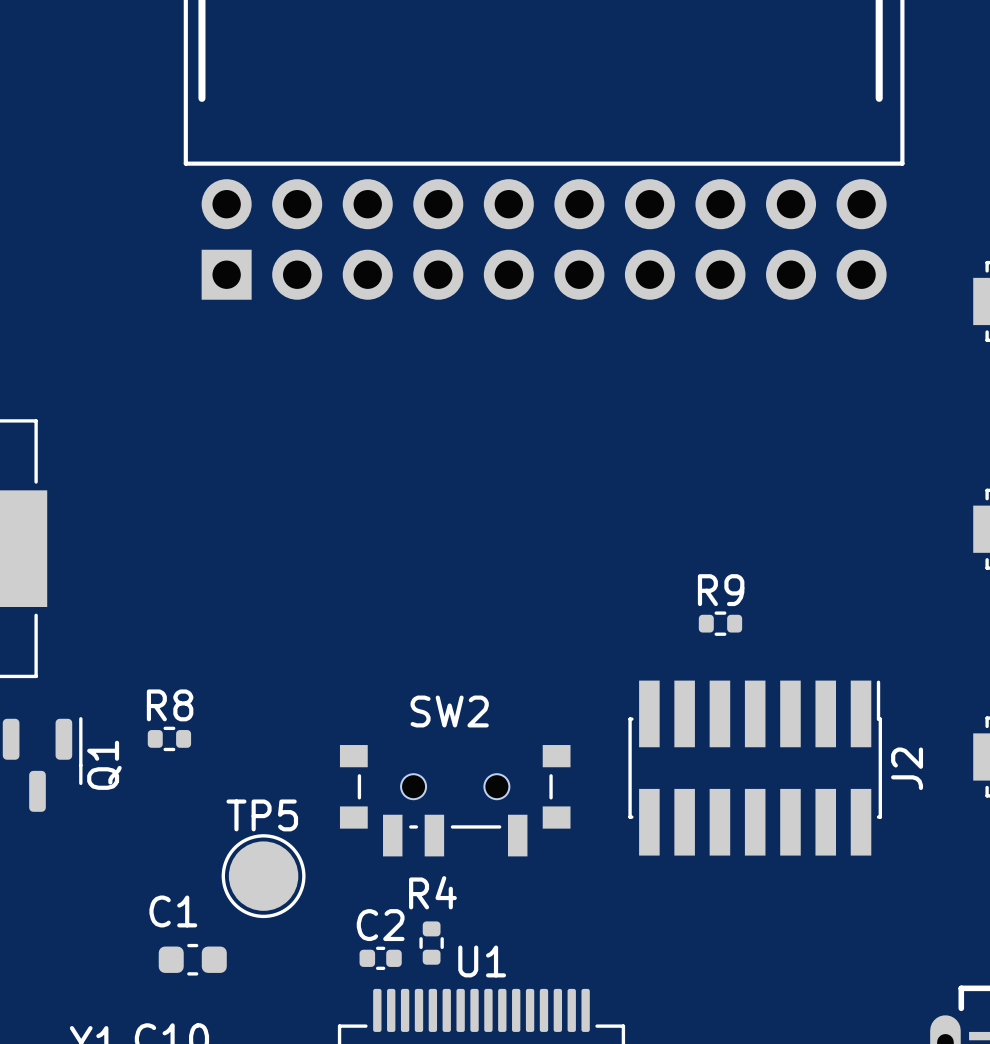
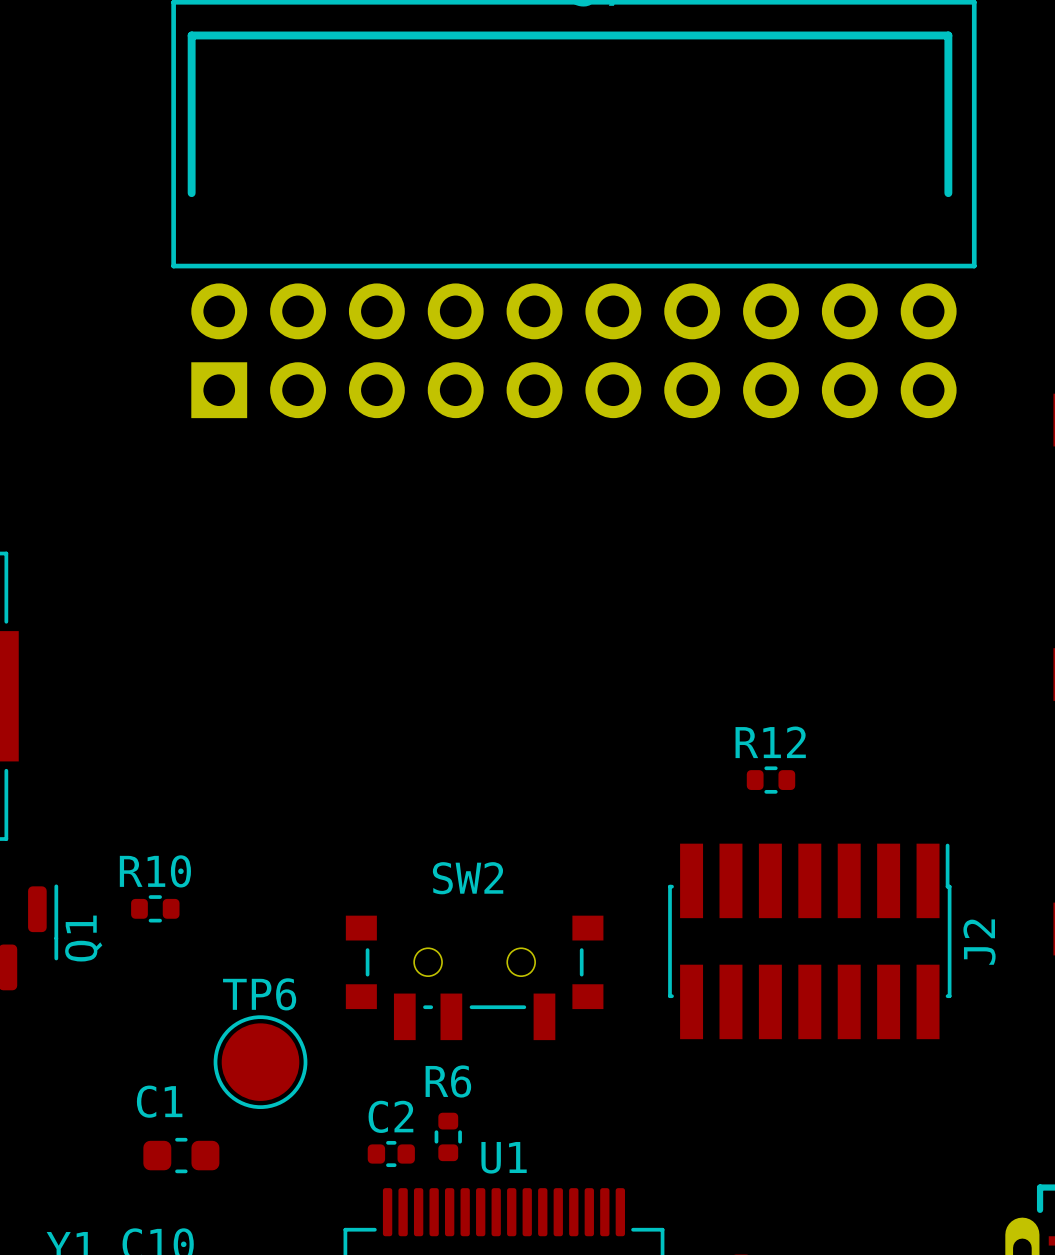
R9 name: R9 (721, 590) -> R12 (770, 742)
R8 name: R8 (170, 705) -> R10 (155, 871)
TP5 name: TP5 (262, 815) -> TP6 (259, 994)
R4 name: R4 (432, 892) -> R6 (448, 1081)

